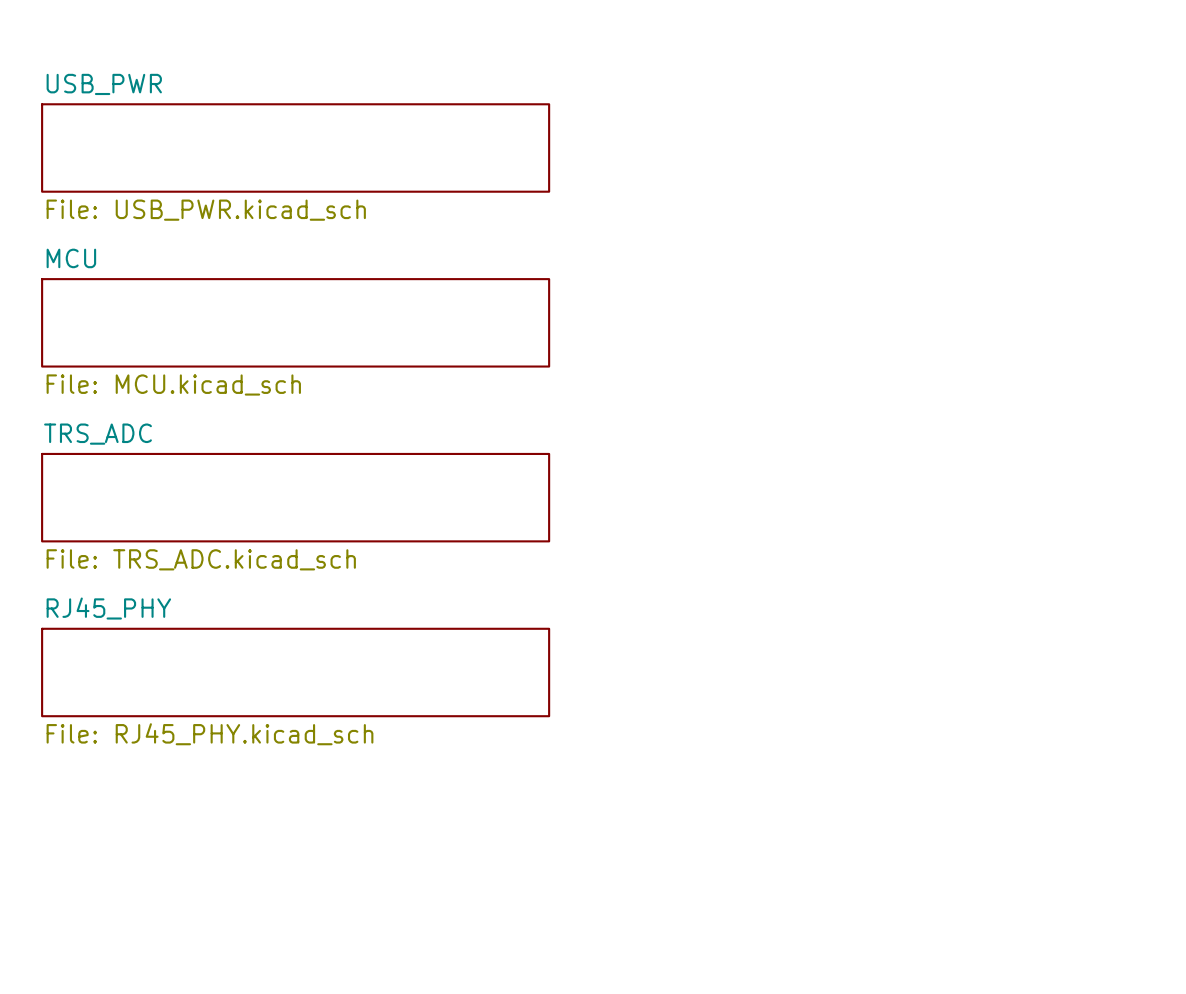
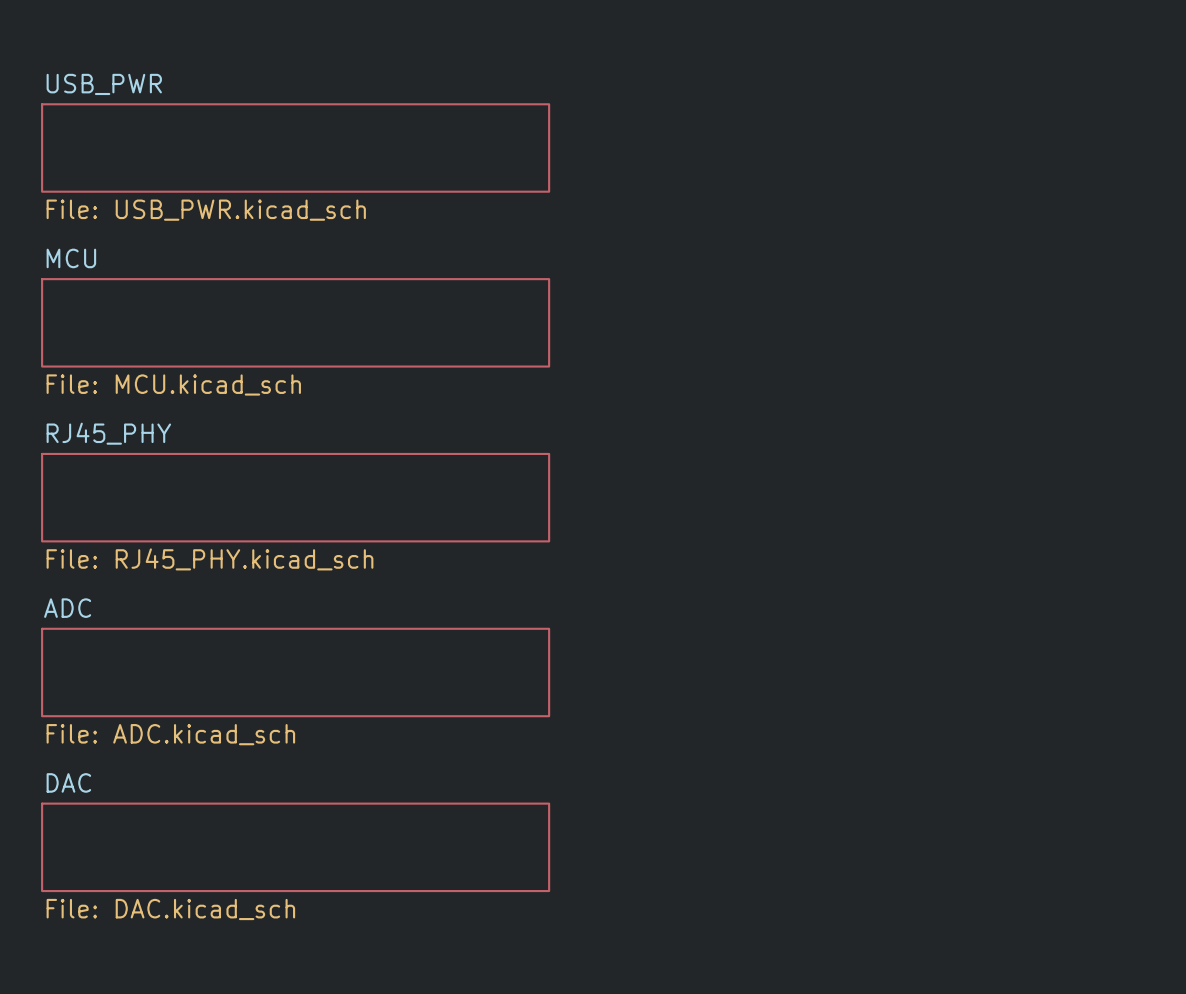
sheet TRS_ADC name: TRS_ADC (98, 434) -> RJ45_PHY (108, 433)
sheet TRS_ADC value: File: TRS_ADC.kicad_sch (201, 559) -> File: RJ45_PHY.kicad_sch (209, 559)
sheet RJ45_PHY name: RJ45_PHY (108, 608) -> ADC (67, 608)
sheet RJ45_PHY value: File: RJ45_PHY.kicad_sch (209, 734) -> File: ADC.kicad_sch (170, 734)
sheet DAC: none -> File: DAC.kicad_sch (295, 847)

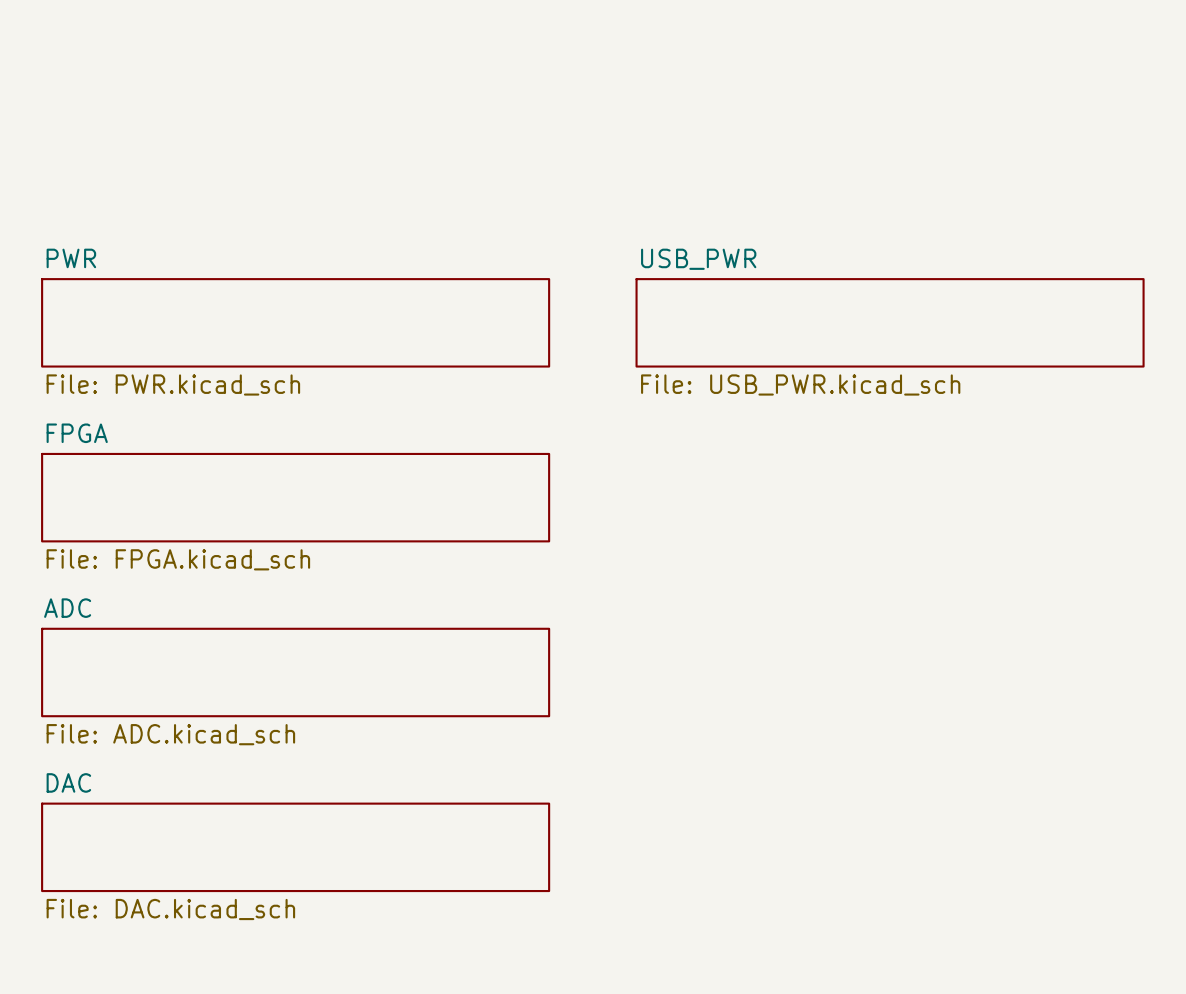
sheet USB_PWR: File: USB_PWR.kicad_sch (295, 147) -> none
sheet MCU name: MCU (71, 258) -> PWR (71, 258)
sheet USB_PWR: none -> File: USB_PWR.kicad_sch (890, 322)
sheet MCU value: File: MCU.kicad_sch (173, 384) -> File: PWR.kicad_sch (173, 384)
sheet RJ45_PHY name: RJ45_PHY (108, 433) -> FPGA (77, 433)
sheet RJ45_PHY value: File: RJ45_PHY.kicad_sch (209, 559) -> File: FPGA.kicad_sch (178, 559)

